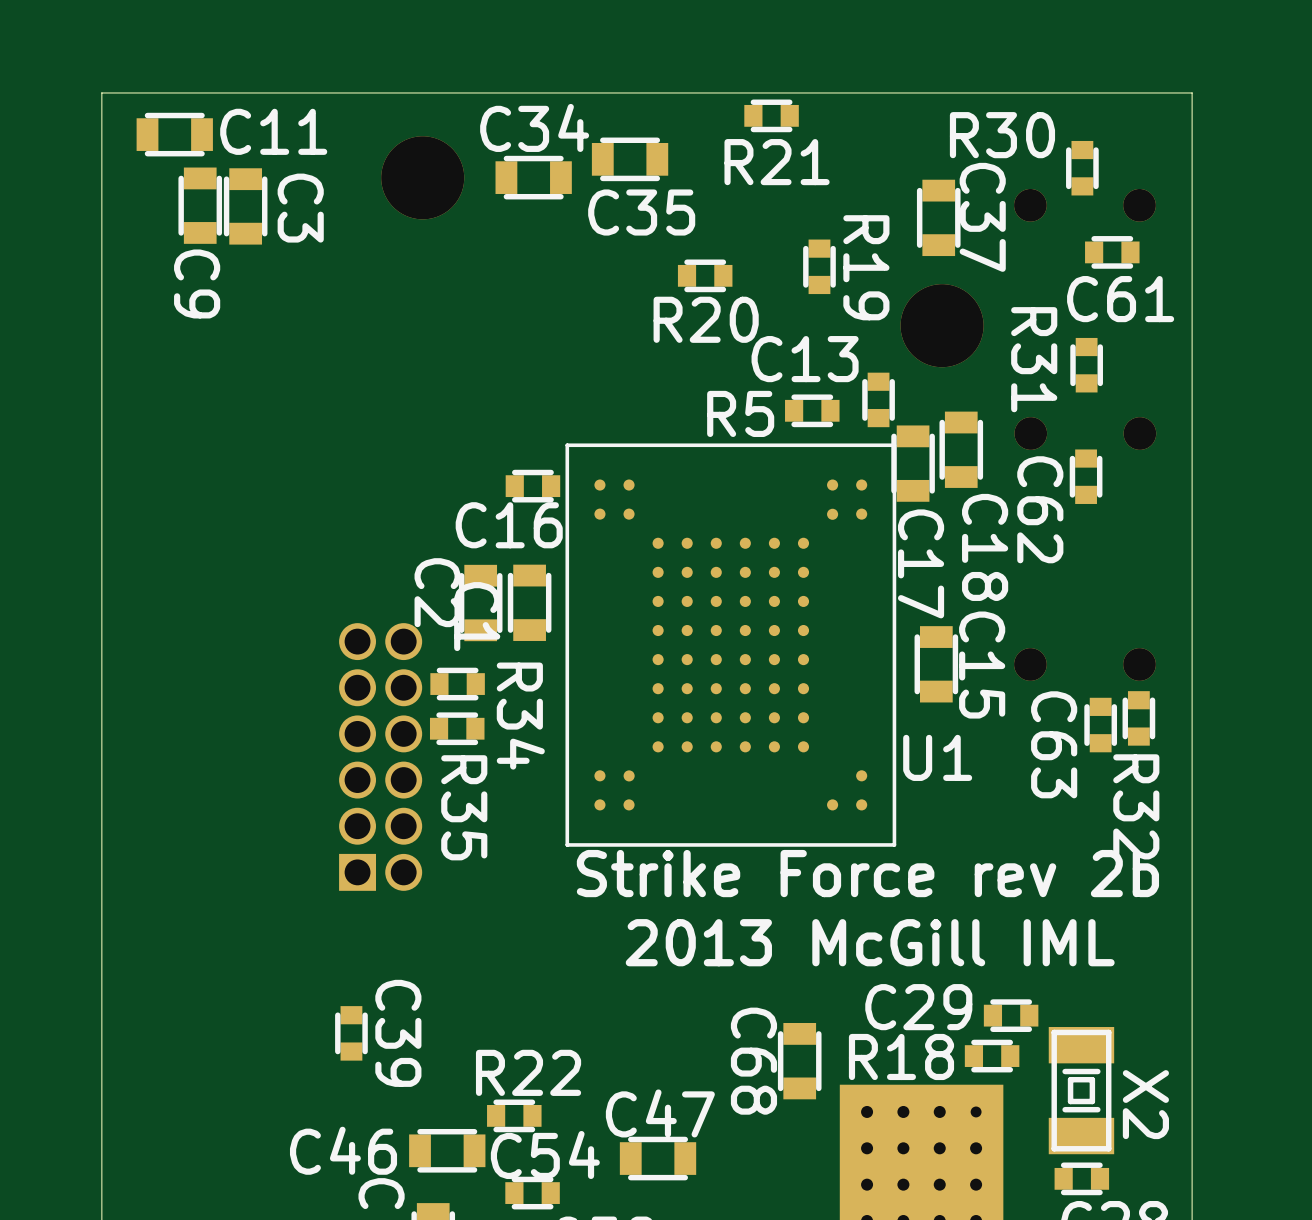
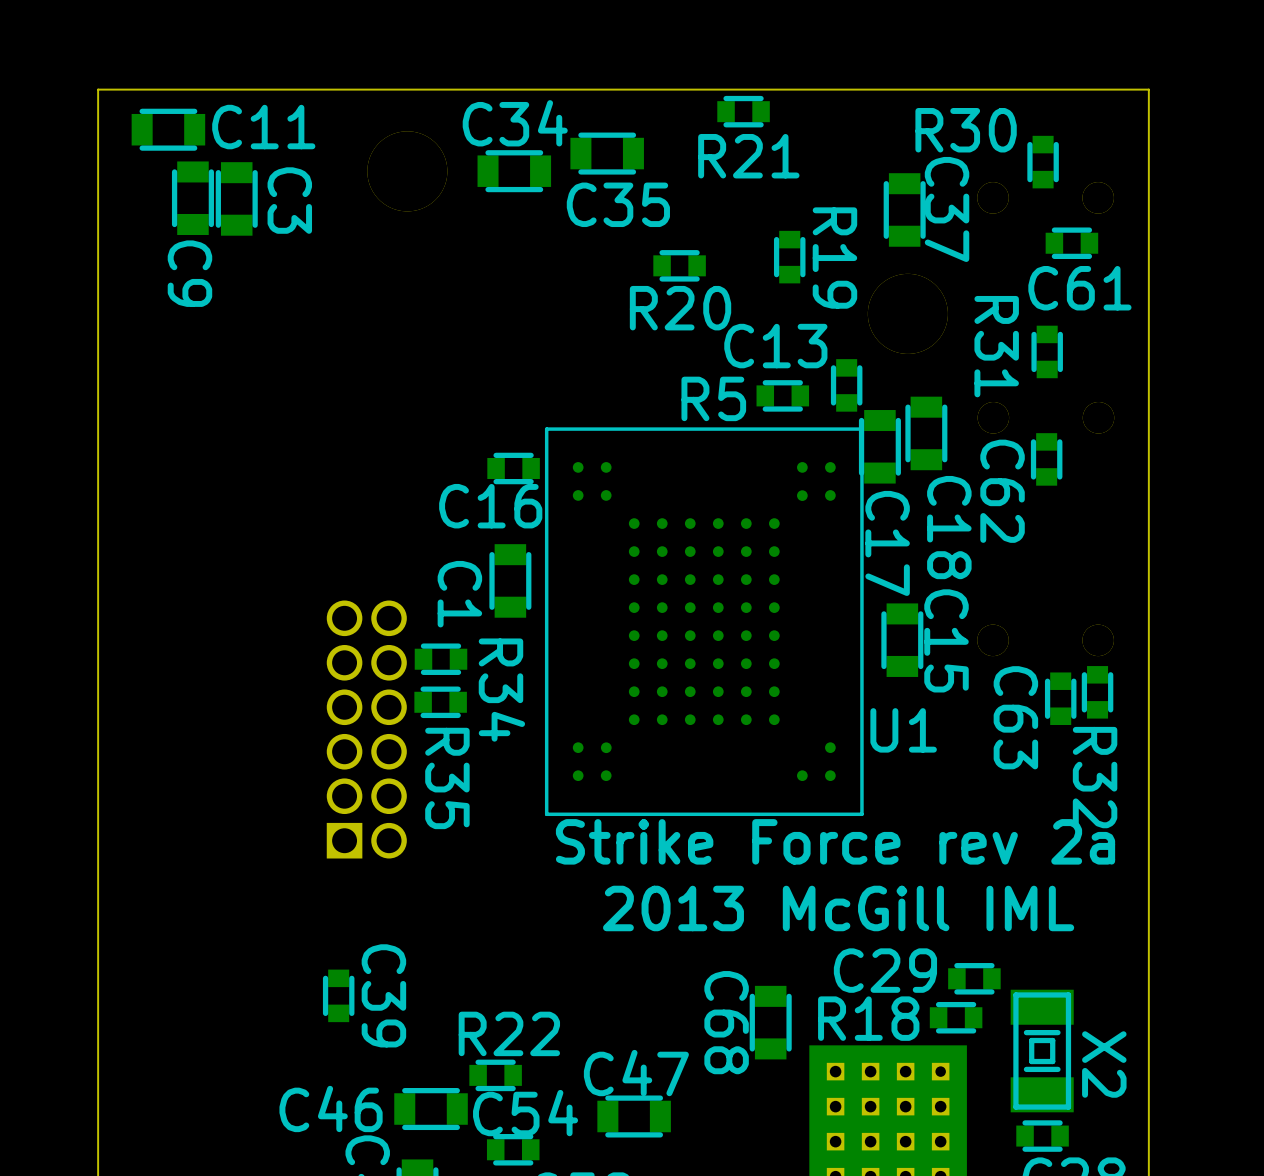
C2: (480, 603) -> none
text: Strike Force rev 2b (867, 873) -> Strike Force rev 2a (835, 841)

